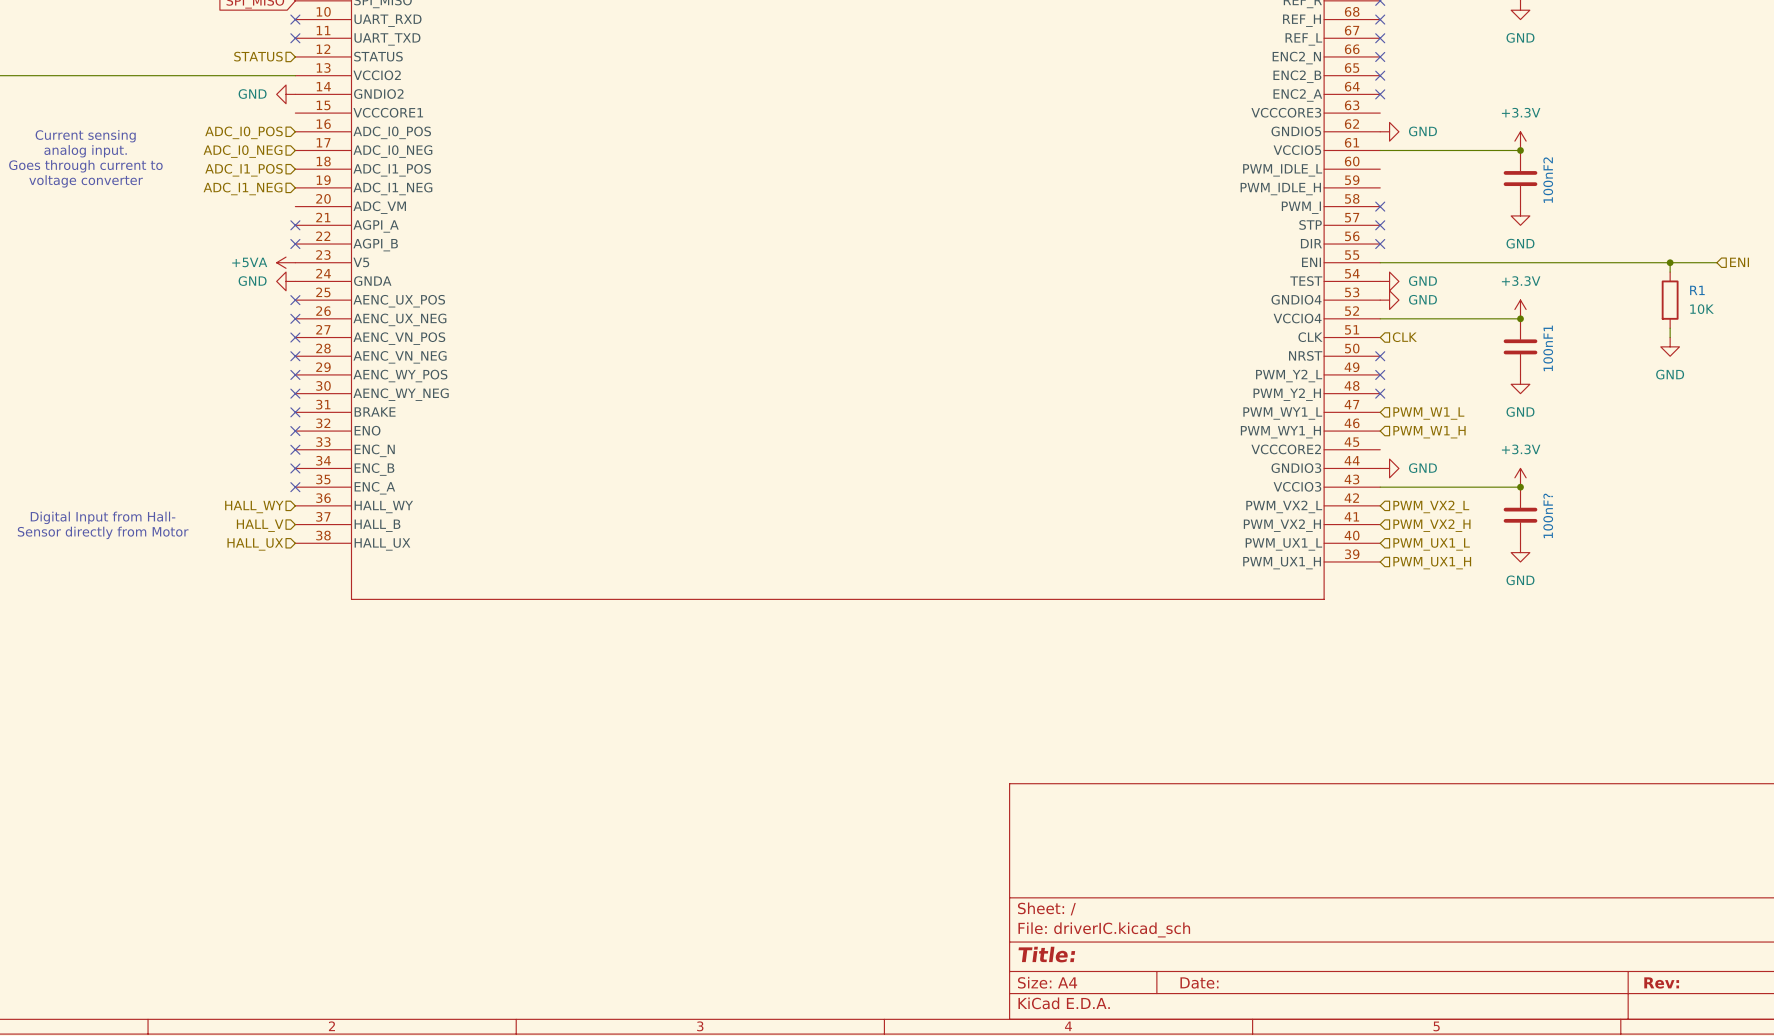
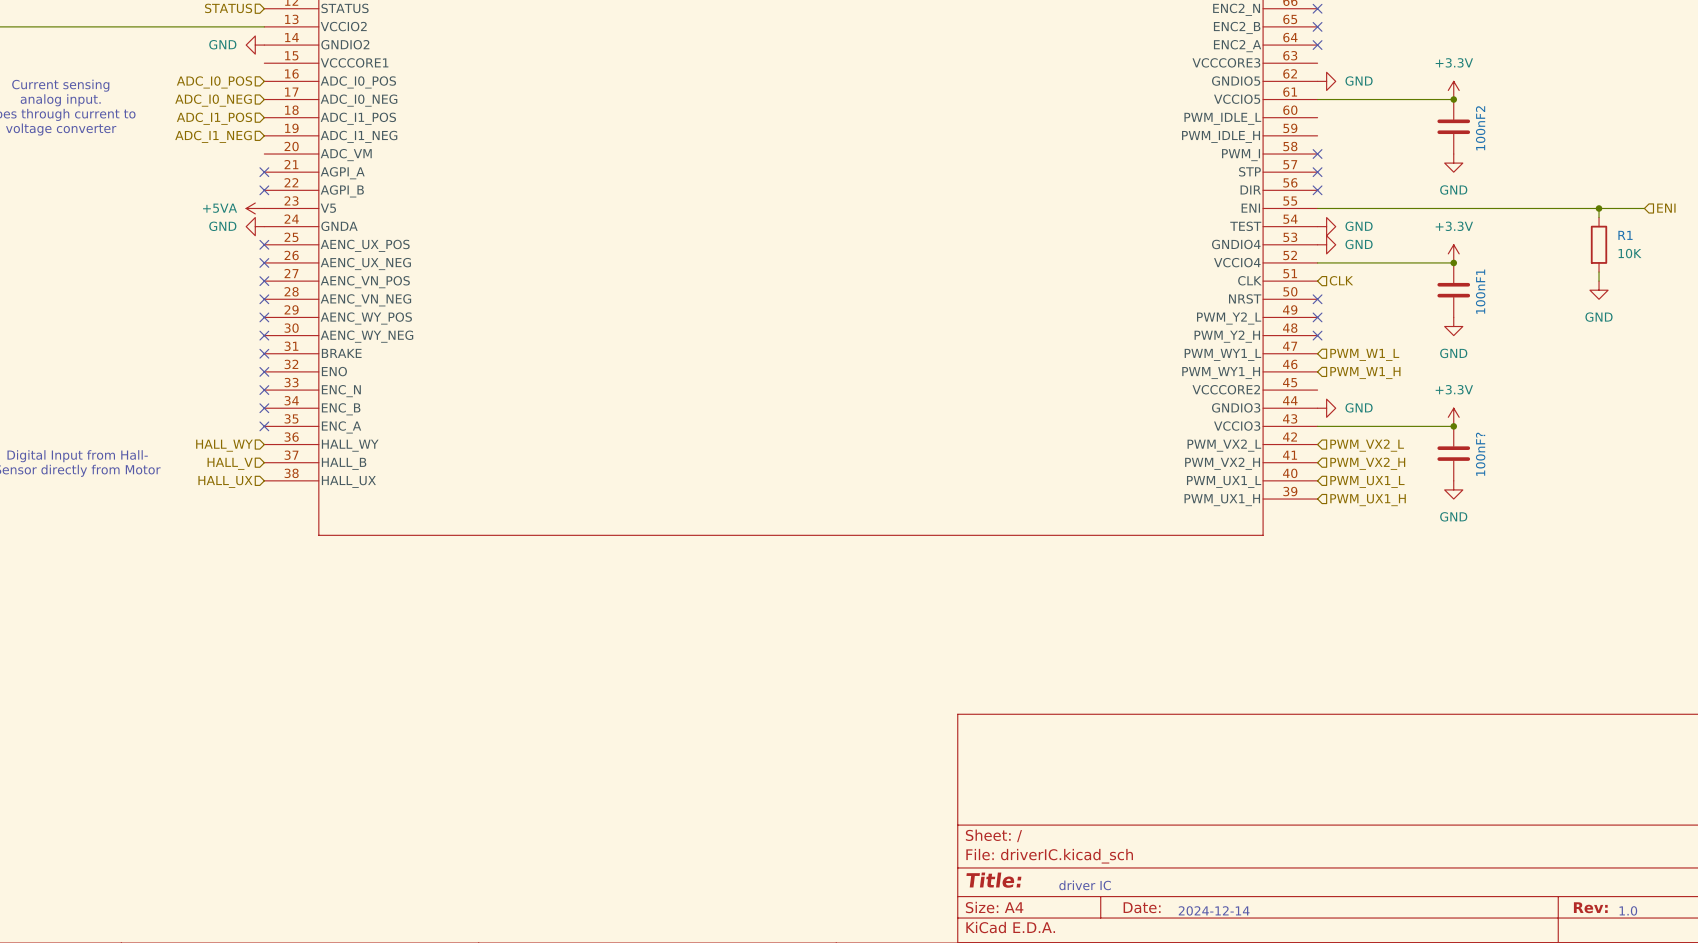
text: none -> driver IC (1085, 885)
text: none -> 2024-12-14 (1214, 910)
text: none -> 1.0 (1628, 910)

